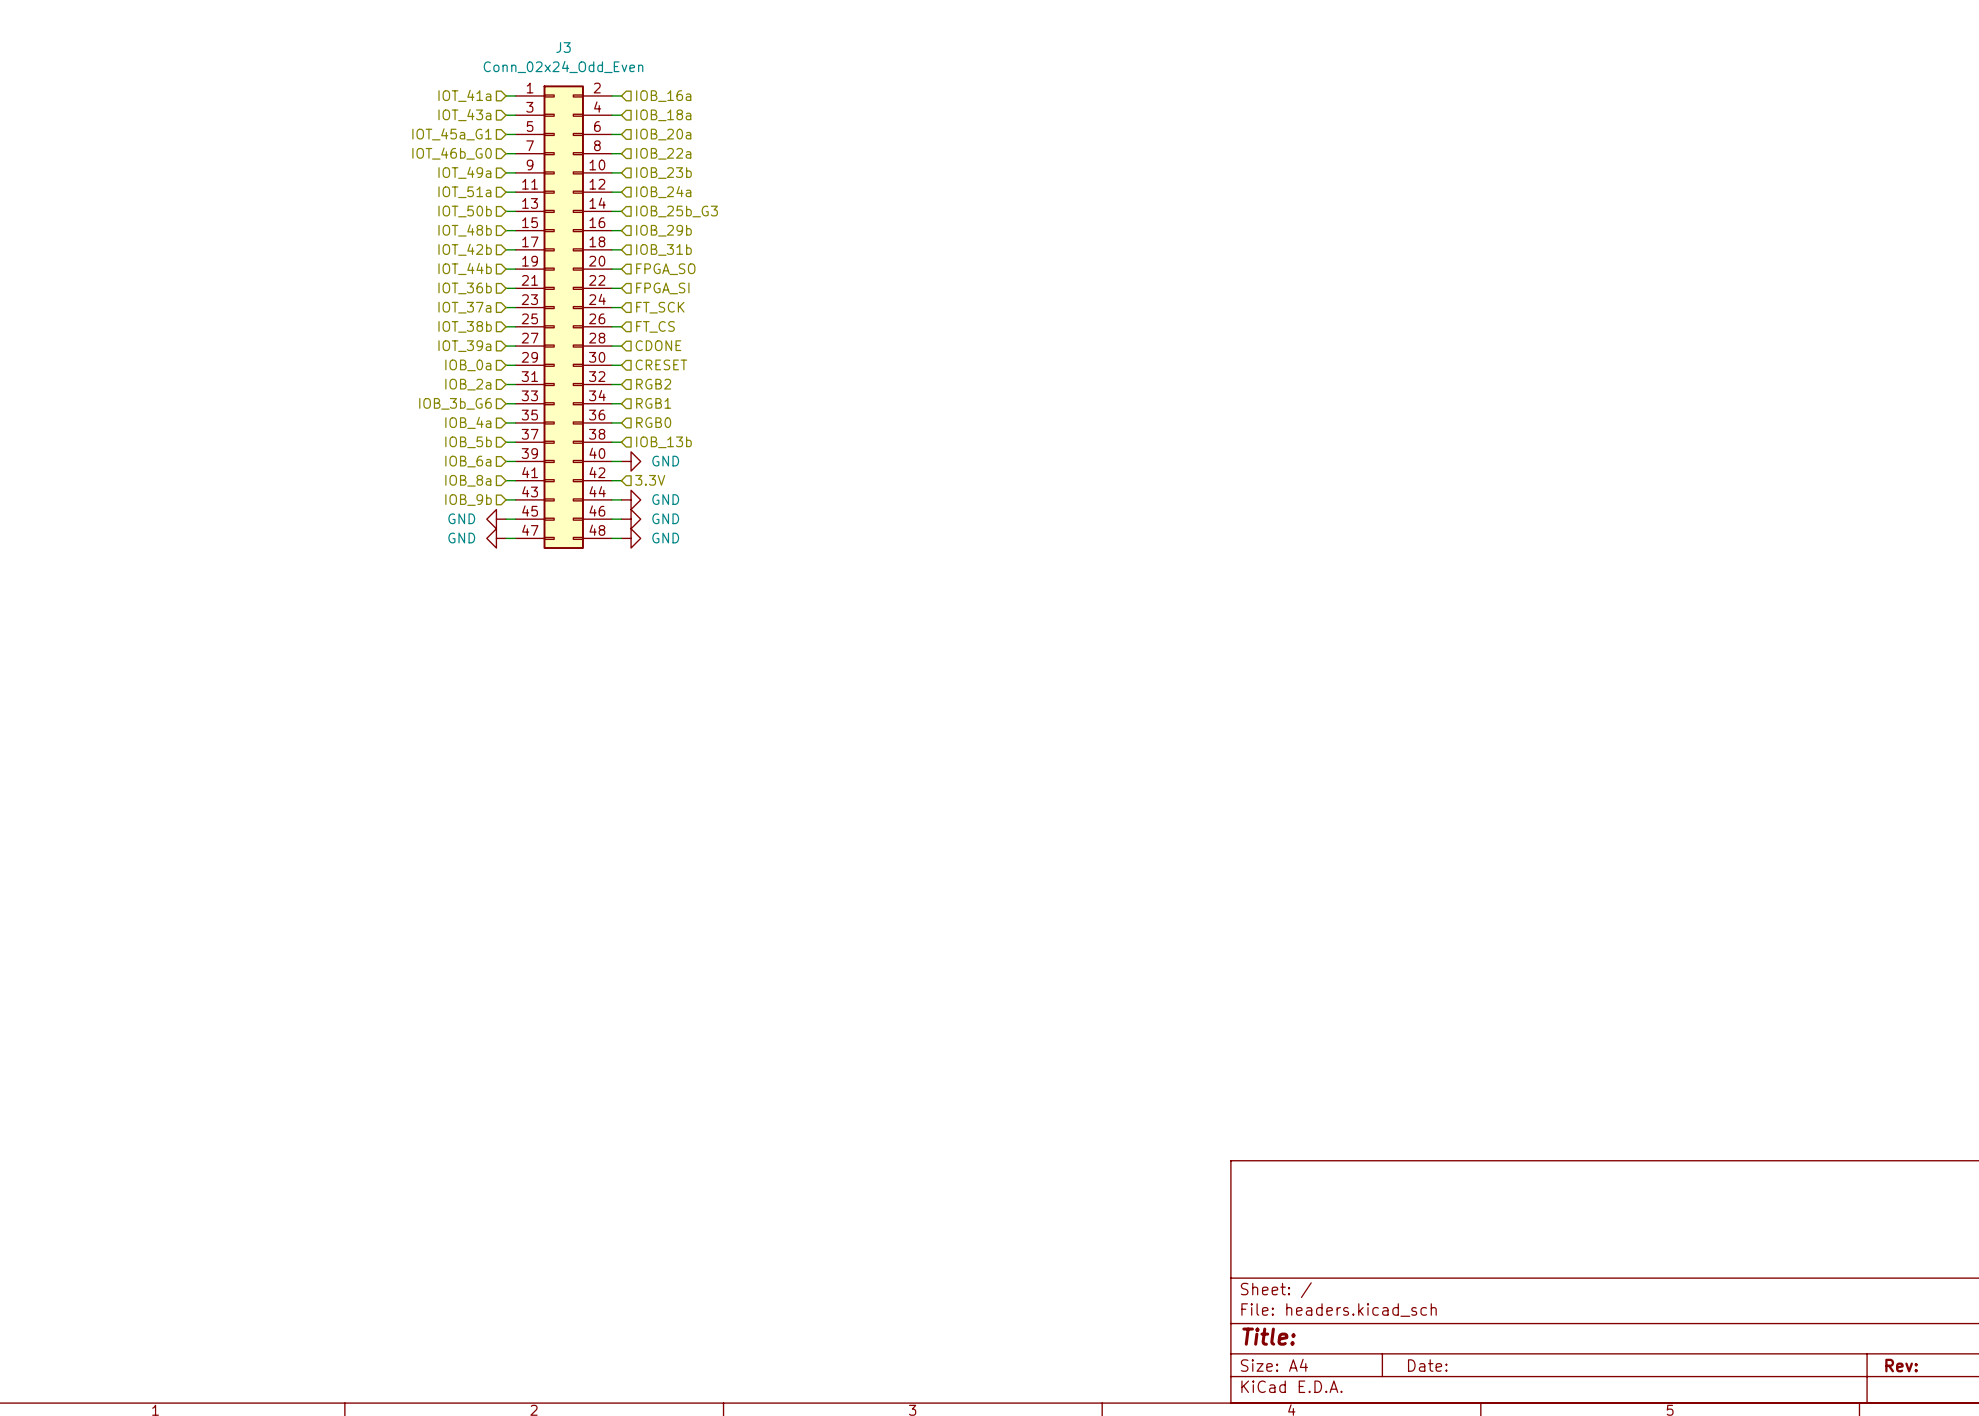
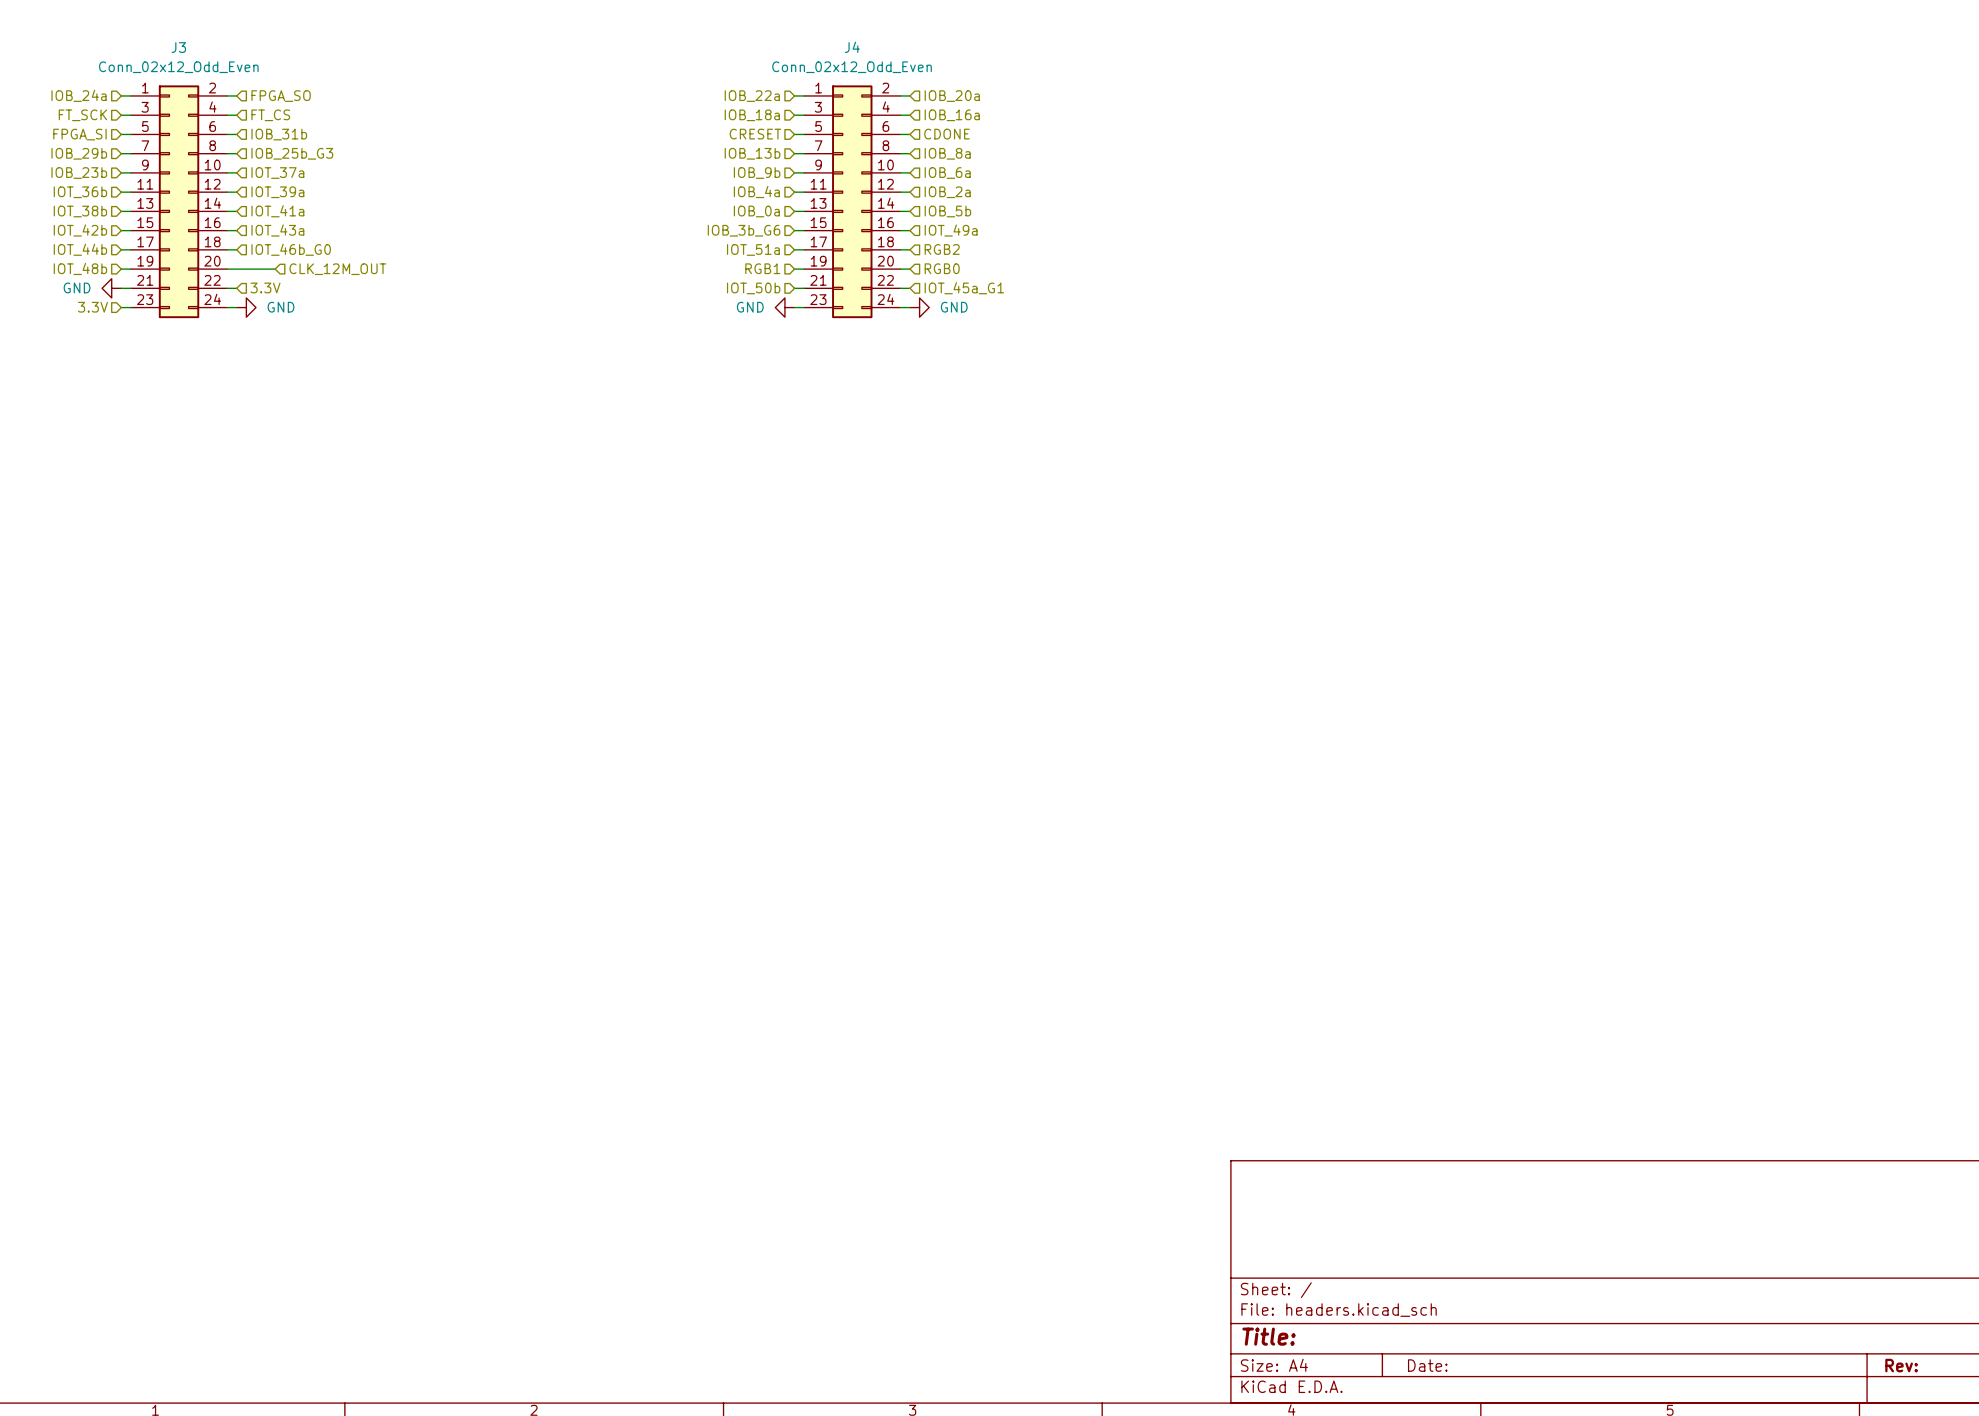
J3 name position: J3 (563, 47) -> J3 (178, 47)
J3 value: Conn_02x24_Odd_Even (563, 66) -> Conn_02x12_Odd_Even (178, 67)
J3 symbol: [515, 85, 612, 549] -> [130, 85, 228, 319]
hierarchical label: none -> IOB_24a (79, 95)
wire: none -> (121, 95) (130, 95)
wire: none -> (227, 95) (236, 95)
hierarchical label: IOT_41a (464, 95) -> none
wire: (506, 95) (515, 95) -> none
wire: (611, 95) (621, 95) -> (794, 95) (804, 95)
wire: none -> (900, 95) (909, 95)
hierarchical label: none -> FPGA_SO (281, 96)
hierarchical label: IOB_16a (663, 96) -> none
hierarchical label: none -> IOB_20a (952, 96)
hierarchical label: none -> FT_SCK (82, 115)
wire: none -> (121, 115) (130, 115)
wire: none -> (227, 115) (236, 115)
hierarchical label: none -> FT_CS (270, 115)
hierarchical label: IOT_43a (464, 115) -> none
wire: (506, 115) (515, 115) -> none
wire: (611, 115) (621, 115) -> (794, 115) (804, 115)
hierarchical label rotation: 0° (663, 115) -> 180° (752, 115)
hierarchical label position: IOB_18a (663, 115) -> IOB_18a (752, 115)
wire: none -> (900, 115) (909, 115)
hierarchical label: none -> IOB_16a (952, 115)
hierarchical label: none -> FPGA_SI (79, 134)
wire: none -> (121, 134) (130, 134)
wire: none -> (227, 134) (236, 134)
hierarchical label: none -> IOB_31b (279, 134)
hierarchical label: IOT_45a_G1 (452, 134) -> none
wire: (506, 134) (515, 134) -> none
wire: (611, 134) (621, 134) -> (794, 134) (804, 134)
hierarchical label: IOB_20a (663, 134) -> none
hierarchical label: none -> CRESET (755, 134)
wire: none -> (900, 134) (909, 134)
hierarchical label: none -> CDONE (946, 134)
hierarchical label: none -> IOB_29b (79, 153)
wire: none -> (121, 153) (130, 153)
wire: none -> (227, 153) (236, 153)
hierarchical label: none -> IOB_25b_G3 (292, 153)
hierarchical label: IOT_46b_G0 (452, 153) -> none
wire: (506, 153) (515, 153) -> none
wire: (611, 153) (621, 153) -> (794, 153) (804, 153)
hierarchical label rotation: 0° (663, 153) -> 180° (752, 96)
hierarchical label position: IOB_22a (663, 153) -> IOB_22a (752, 96)
hierarchical label: none -> IOB_13b (752, 153)
wire: none -> (900, 153) (909, 153)
hierarchical label: none -> IOB_8a (947, 153)
wire: none -> (121, 172) (130, 172)
wire: none -> (227, 172) (236, 172)
hierarchical label: IOT_49a (464, 172) -> none
wire: (506, 172) (515, 172) -> none
wire: (611, 172) (621, 172) -> (794, 172) (804, 172)
wire: none -> (900, 172) (909, 172)
hierarchical label: none -> IOB_23b (79, 173)
hierarchical label: none -> IOT_37a (277, 173)
hierarchical label: IOB_23b (663, 173) -> none
hierarchical label: none -> IOB_9b (757, 173)
hierarchical label: none -> IOB_6a (947, 173)
hierarchical label: none -> IOT_36b (80, 192)
wire: none -> (121, 192) (130, 192)
wire: none -> (227, 192) (236, 192)
hierarchical label: none -> IOT_39a (277, 192)
hierarchical label: IOT_51a (464, 192) -> none
wire: (506, 192) (515, 192) -> none
wire: (611, 192) (621, 192) -> (794, 192) (804, 192)
hierarchical label: IOB_24a (663, 192) -> none
hierarchical label: none -> IOB_4a (756, 192)
wire: none -> (900, 192) (909, 192)
hierarchical label: none -> IOB_2a (947, 192)
J4: none -> Conn_02x12_Odd_Even (852, 201)
hierarchical label: none -> IOT_38b (80, 211)
wire: none -> (121, 211) (130, 211)
wire: none -> (227, 211) (236, 211)
hierarchical label: none -> IOT_41a (277, 211)
hierarchical label: IOT_50b (465, 211) -> none
wire: (506, 211) (515, 211) -> none
wire: (611, 211) (621, 211) -> (794, 211) (804, 211)
hierarchical label: IOB_25b_G3 (677, 211) -> none
hierarchical label: none -> IOB_0a (756, 211)
wire: none -> (900, 211) (909, 211)
hierarchical label: none -> IOB_5b (947, 211)
hierarchical label: none -> IOT_42b (80, 230)
wire: none -> (121, 230) (130, 230)
wire: none -> (227, 230) (236, 230)
hierarchical label: none -> IOT_43a (277, 230)
hierarchical label: IOT_48b (465, 230) -> none
wire: (506, 230) (515, 230) -> none
wire: (611, 230) (621, 230) -> (794, 230) (804, 230)
hierarchical label: IOB_29b (663, 230) -> none
hierarchical label: none -> IOB_3b_G6 (744, 230)
wire: none -> (900, 230) (909, 230)
hierarchical label: none -> IOT_49a (951, 230)
hierarchical label: none -> IOT_44b (80, 249)
wire: none -> (121, 249) (130, 249)
wire: none -> (227, 249) (236, 249)
hierarchical label: none -> IOT_46b_G0 (291, 249)
hierarchical label: IOT_42b (465, 249) -> none
wire: (506, 249) (515, 249) -> none
wire: (611, 249) (621, 249) -> (794, 249) (804, 249)
hierarchical label: IOB_31b (663, 249) -> none
hierarchical label: none -> IOT_51a (753, 249)
wire: none -> (900, 249) (909, 249)
hierarchical label: none -> RGB2 (942, 249)
hierarchical label: none -> IOT_48b (80, 268)
hierarchical label: IOT_44b (465, 268) -> none
hierarchical label: none -> RGB1 (762, 268)
hierarchical label: none -> RGB0 (942, 268)
wire: none -> (121, 269) (130, 269)
wire: none -> (227, 269) (275, 269)
hierarchical label: none -> CLK_12M_OUT (337, 269)
wire: (506, 269) (515, 269) -> none
wire: (611, 269) (621, 269) -> (794, 269) (804, 269)
hierarchical label: FPGA_SO (665, 269) -> none
wire: none -> (900, 269) (909, 269)
hierarchical label: none -> 3.3V (265, 287)
power symbol: none -> GND (111, 288)
wire: none -> (121, 288) (130, 288)
wire: none -> (227, 288) (236, 288)
hierarchical label: IOT_36b (465, 288) -> none
wire: (506, 288) (515, 288) -> none
wire: (611, 288) (621, 288) -> (794, 288) (804, 288)
hierarchical label: FPGA_SI (662, 288) -> none
hierarchical label: none -> IOT_50b (753, 288)
wire: none -> (900, 288) (909, 288)
hierarchical label: none -> IOT_45a_G1 (964, 288)
hierarchical label: none -> 3.3V (93, 307)
wire: none -> (121, 307) (130, 307)
wire: none -> (227, 307) (236, 307)
power symbol: none -> GND (246, 307)
hierarchical label: IOT_37a (464, 307) -> none
wire: (506, 307) (515, 307) -> none
wire: (611, 307) (621, 307) -> (794, 307) (804, 307)
hierarchical label: FT_SCK (660, 307) -> none
power symbol: none -> GND (784, 307)
wire: none -> (900, 307) (909, 307)
power symbol: none -> GND (919, 307)
hierarchical label: IOT_38b (465, 326) -> none
wire: (506, 326) (515, 326) -> none
wire: (611, 326) (621, 326) -> none
hierarchical label: FT_CS (655, 326) -> none
hierarchical label: CDONE (658, 345) -> none
hierarchical label: IOT_39a (464, 346) -> none
wire: (506, 346) (515, 346) -> none
wire: (611, 346) (621, 346) -> none
hierarchical label: CRESET (661, 364) -> none
hierarchical label: IOB_0a (468, 365) -> none
wire: (506, 365) (515, 365) -> none
wire: (611, 365) (621, 365) -> none
hierarchical label: IOB_2a (468, 384) -> none
wire: (506, 384) (515, 384) -> none
wire: (611, 384) (621, 384) -> none
hierarchical label: RGB2 (653, 384) -> none
hierarchical label: IOB_3b_G6 (455, 403) -> none
wire: (506, 403) (515, 403) -> none
wire: (611, 403) (621, 403) -> none
hierarchical label: RGB1 (653, 403) -> none
hierarchical label: IOB_4a (468, 422) -> none
wire: (506, 422) (515, 422) -> none
wire: (611, 422) (621, 422) -> none
hierarchical label: RGB0 (653, 422) -> none
hierarchical label: IOB_5b (468, 442) -> none
wire: (506, 442) (515, 442) -> none
wire: (611, 442) (621, 442) -> none
hierarchical label: IOB_13b (663, 442) -> none
hierarchical label: IOB_6a (468, 461) -> none
wire: (506, 461) (515, 461) -> none
wire: (611, 461) (621, 461) -> none
power symbol: GND (631, 461) -> none
hierarchical label: IOB_8a (468, 480) -> none
wire: (506, 480) (515, 480) -> none
wire: (611, 480) (621, 480) -> none
hierarchical label: 3.3V (650, 480) -> none
wire: (506, 499) (515, 499) -> none
wire: (611, 499) (621, 499) -> none
power symbol: GND (631, 499) -> none
hierarchical label: IOB_9b (468, 500) -> none
power symbol: GND (496, 519) -> none
wire: (506, 519) (515, 519) -> none
wire: (611, 519) (621, 519) -> none
power symbol: GND (631, 519) -> none
power symbol: GND (496, 538) -> none
wire: (506, 538) (515, 538) -> none
wire: (611, 538) (621, 538) -> none
power symbol: GND (631, 538) -> none

